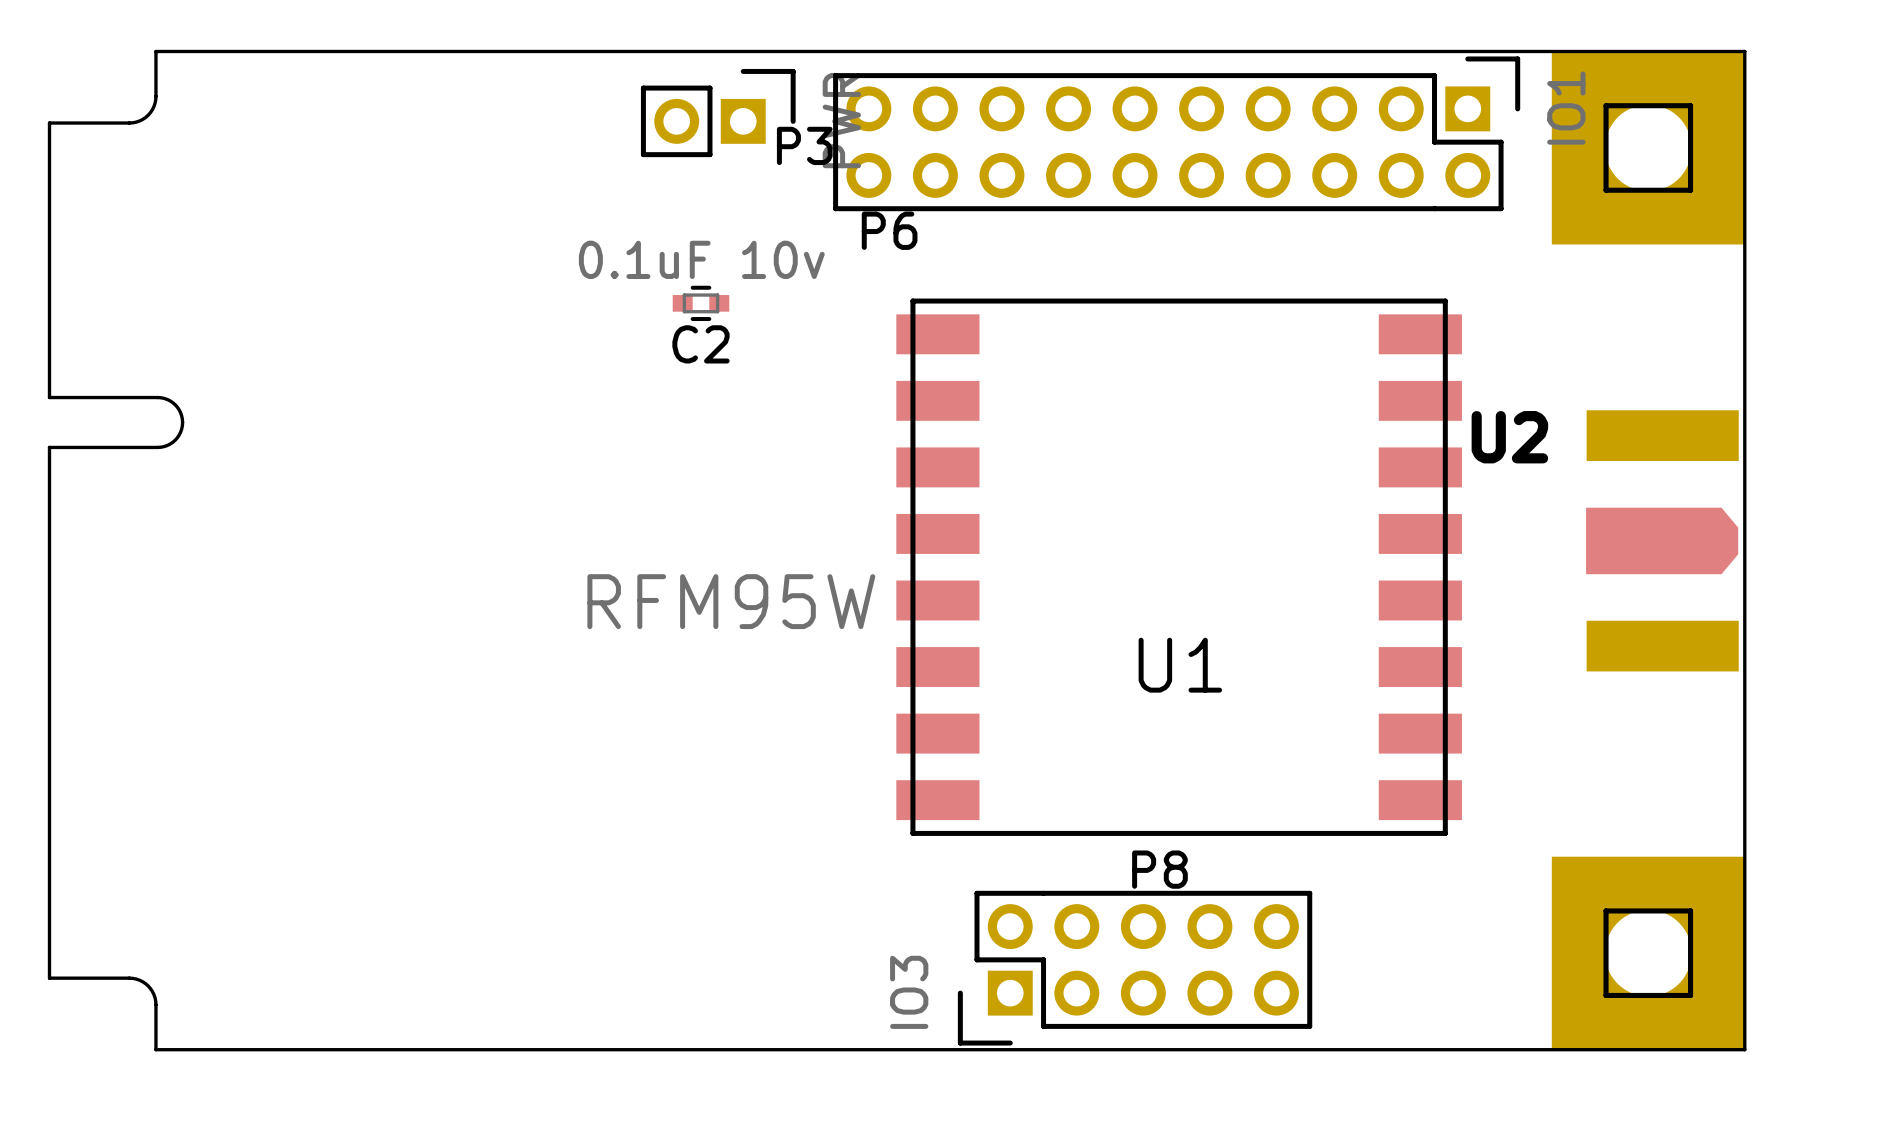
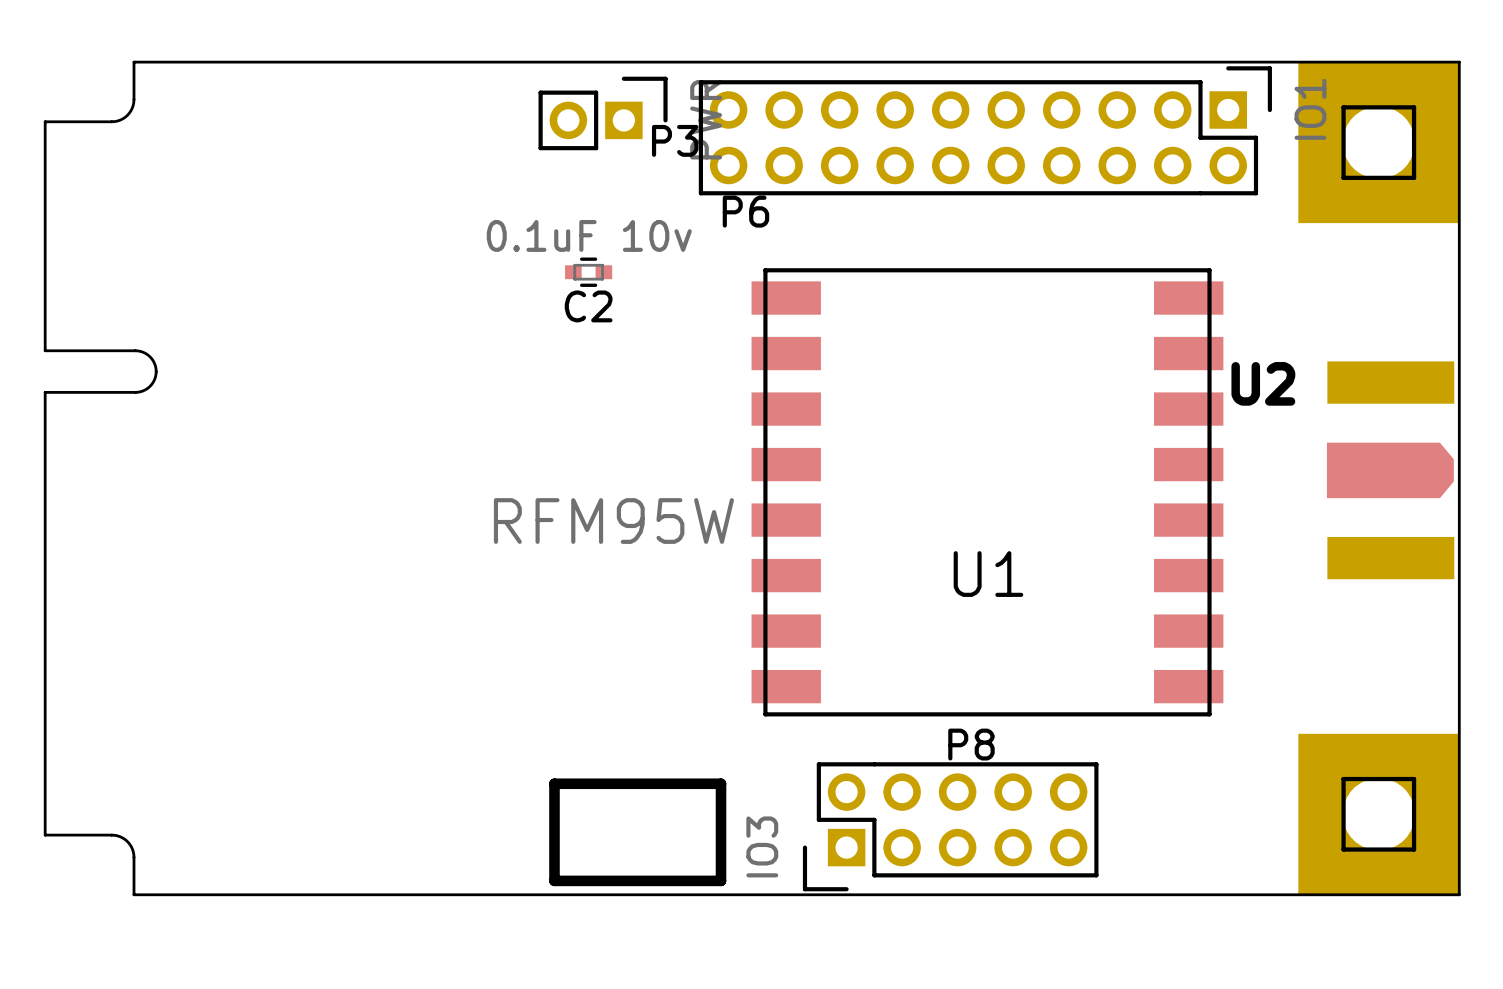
board edge: none -> (554, 783) (554, 880) (721, 880) (721, 783) (554, 783)

